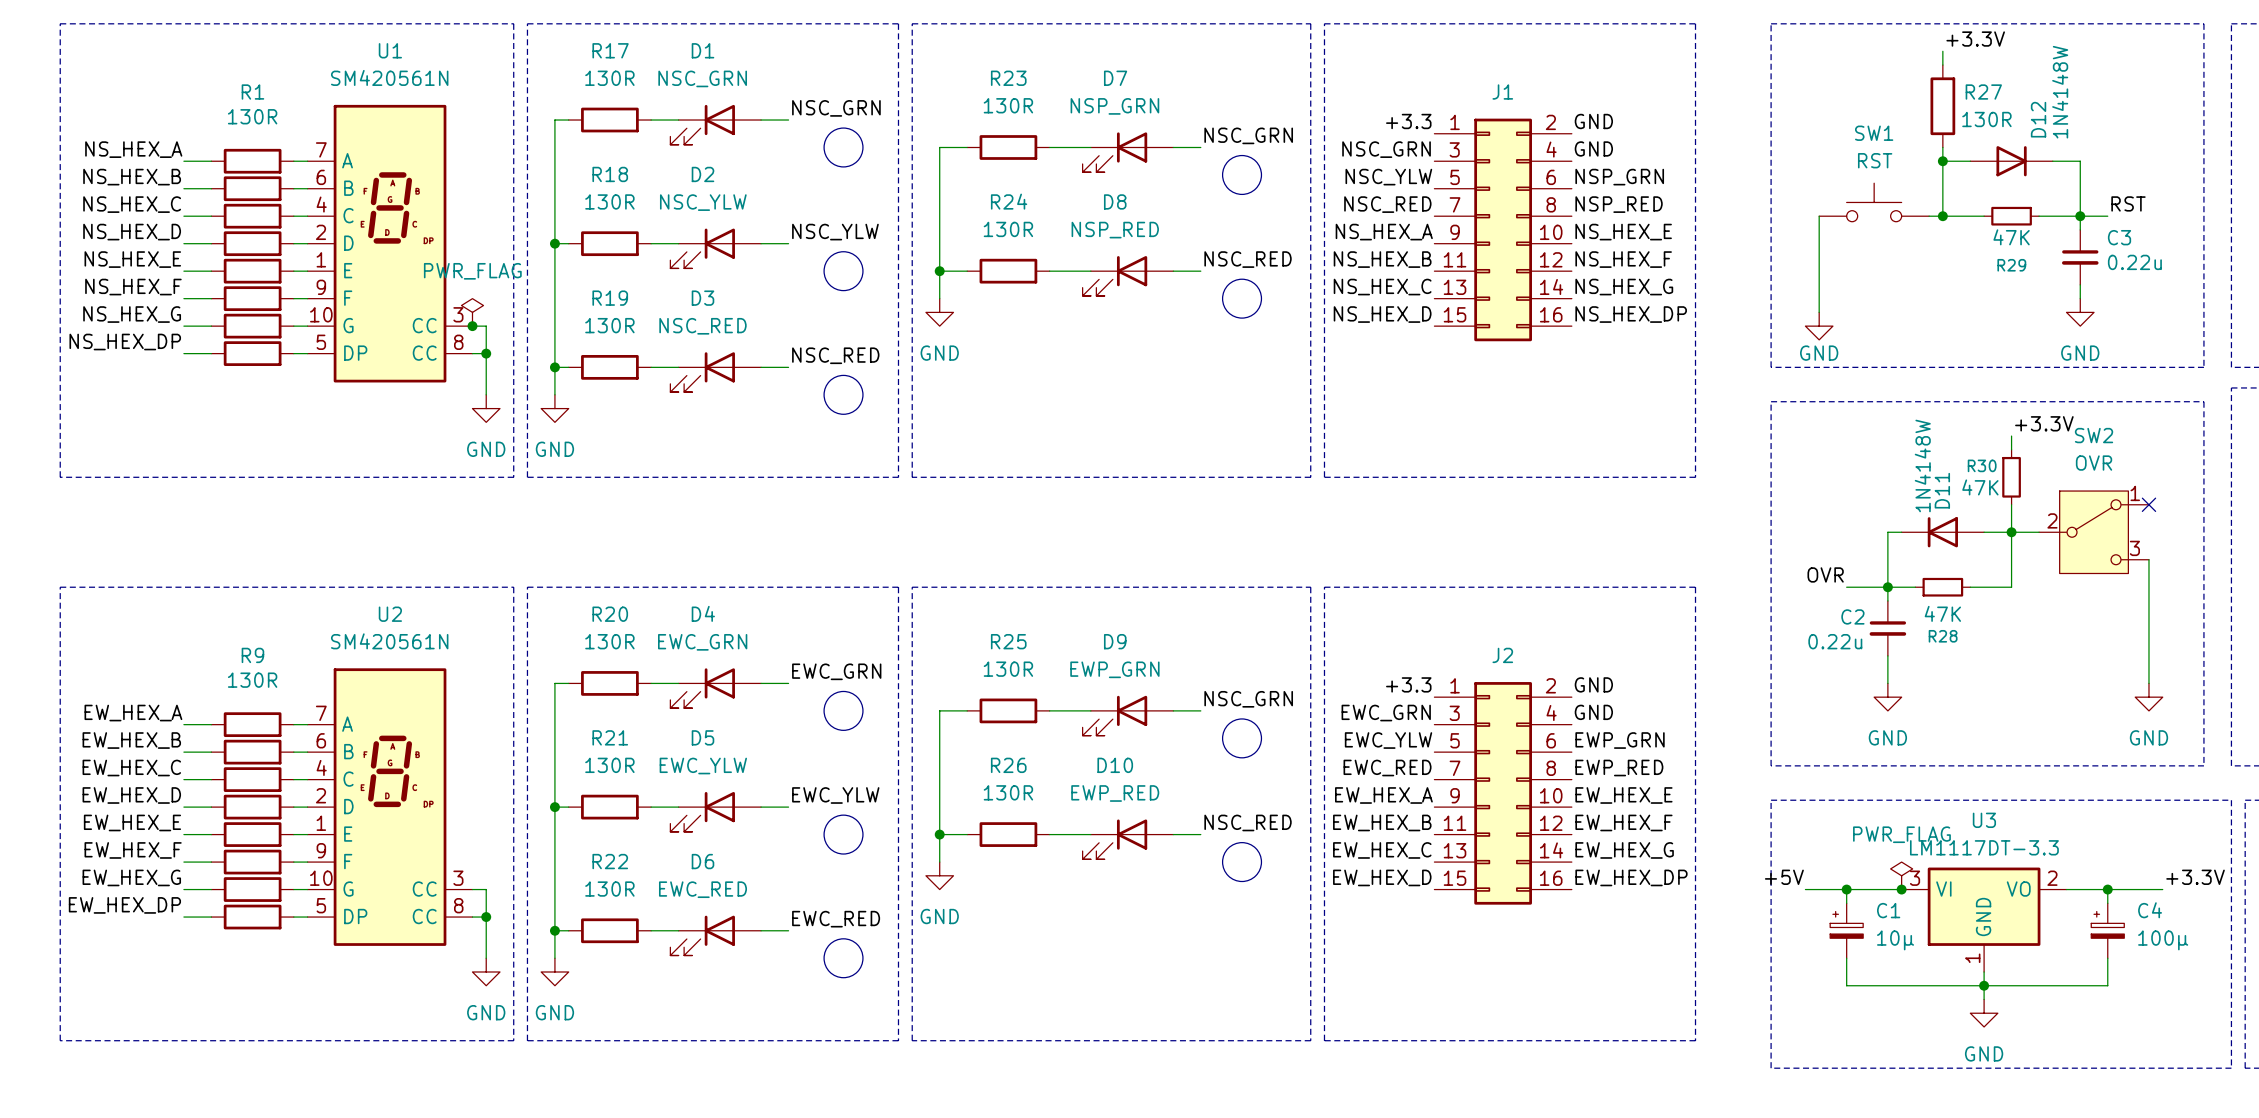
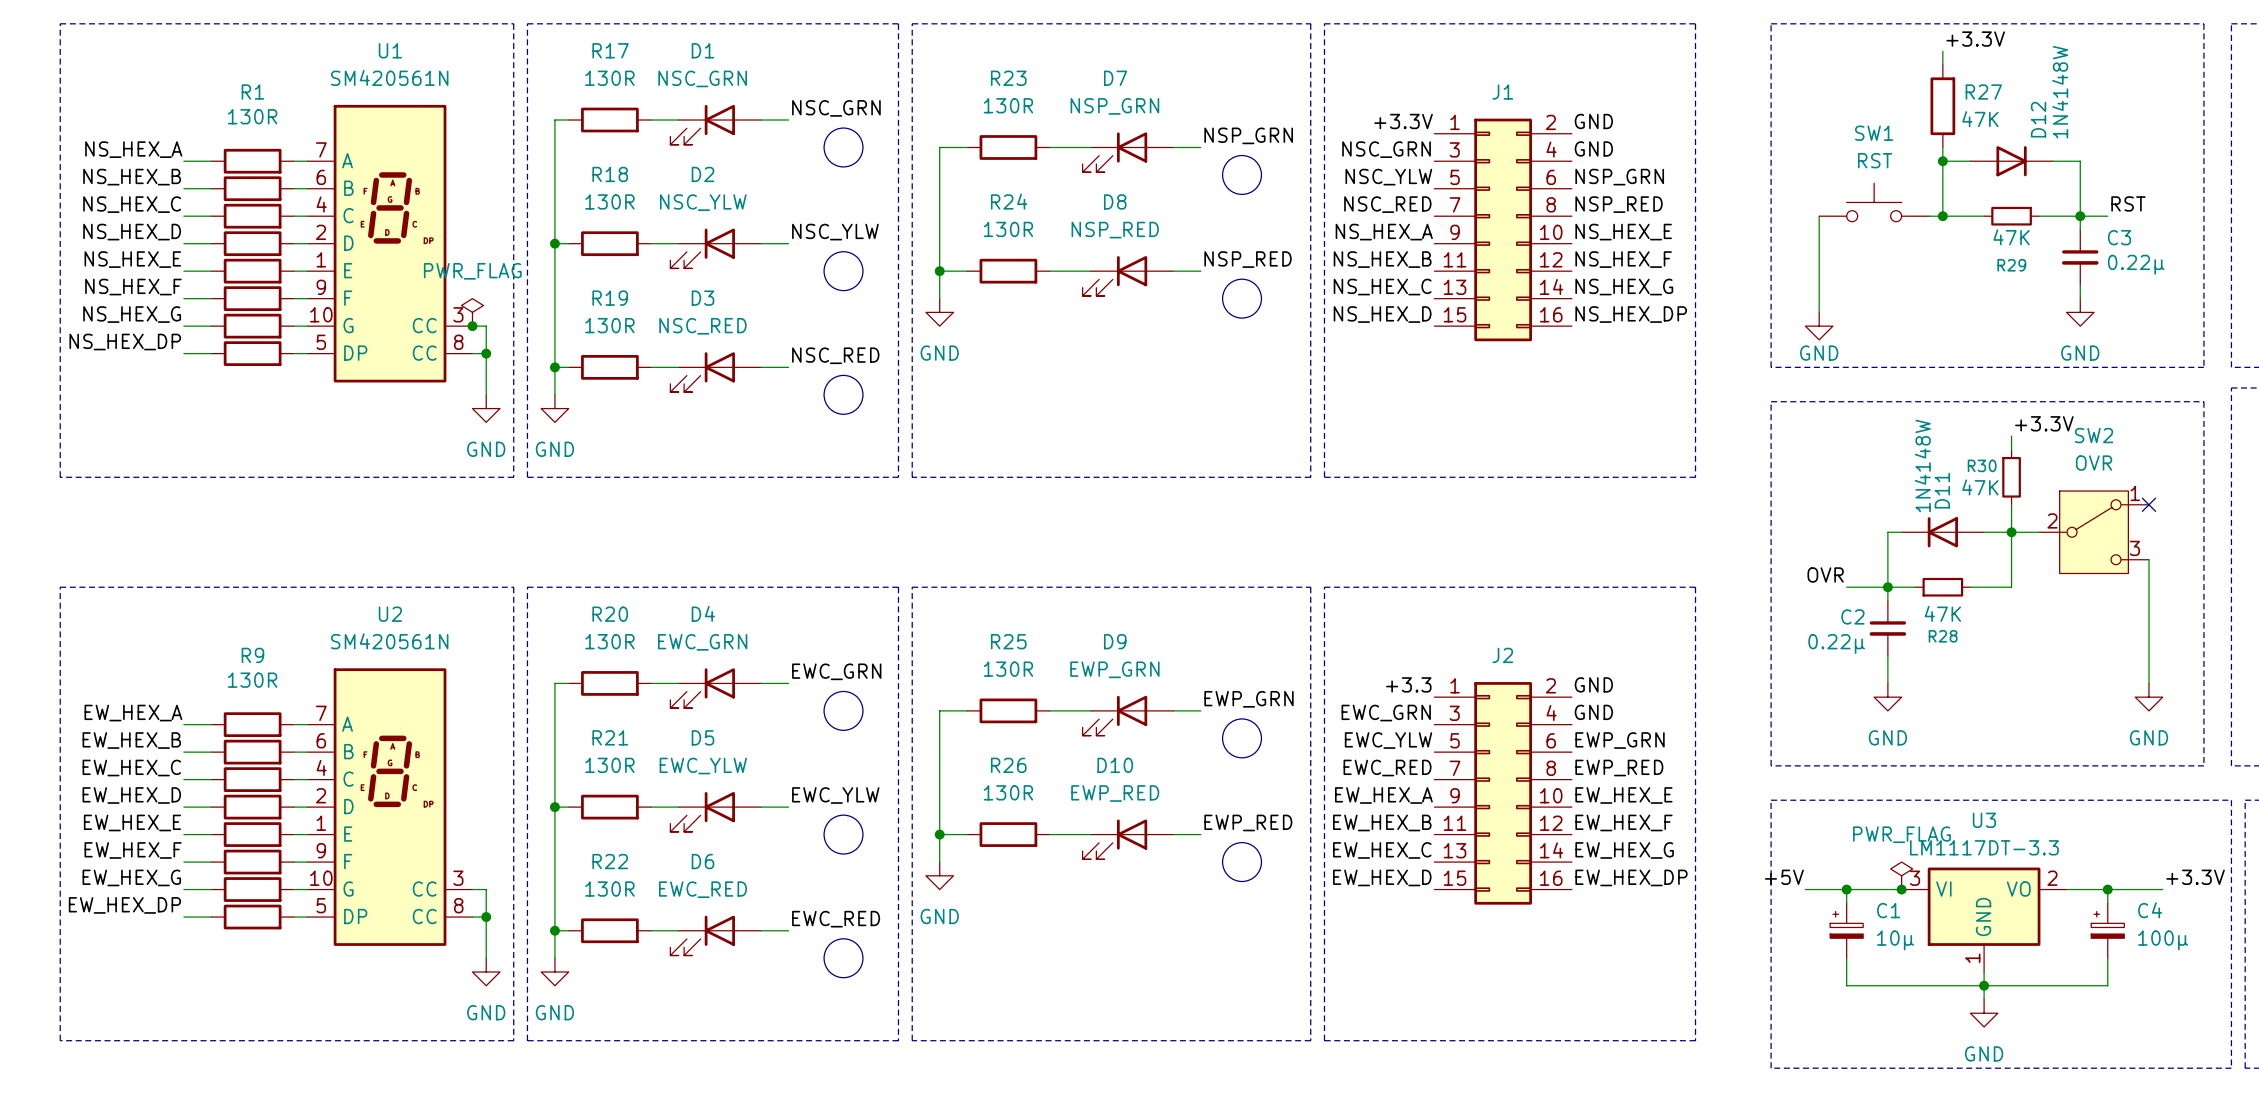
R27 value: 130R (1986, 119) -> 47K (1980, 119)
label: +3.3 (1408, 121) -> +3.3V (1403, 121)
label: NSC_GRN (1248, 135) -> NSP_GRN (1248, 135)
label: NSC_RED (1248, 259) -> NSP_RED (1248, 259)
C3 value: 0.22u (2134, 262) -> 0.22μ (2136, 264)
C2 value: 0.22u (1835, 641) -> 0.22μ (1836, 643)
label: NSC_GRN (1248, 699) -> EWP_GRN (1249, 699)
label: NSC_RED (1248, 822) -> EWP_RED (1248, 822)

